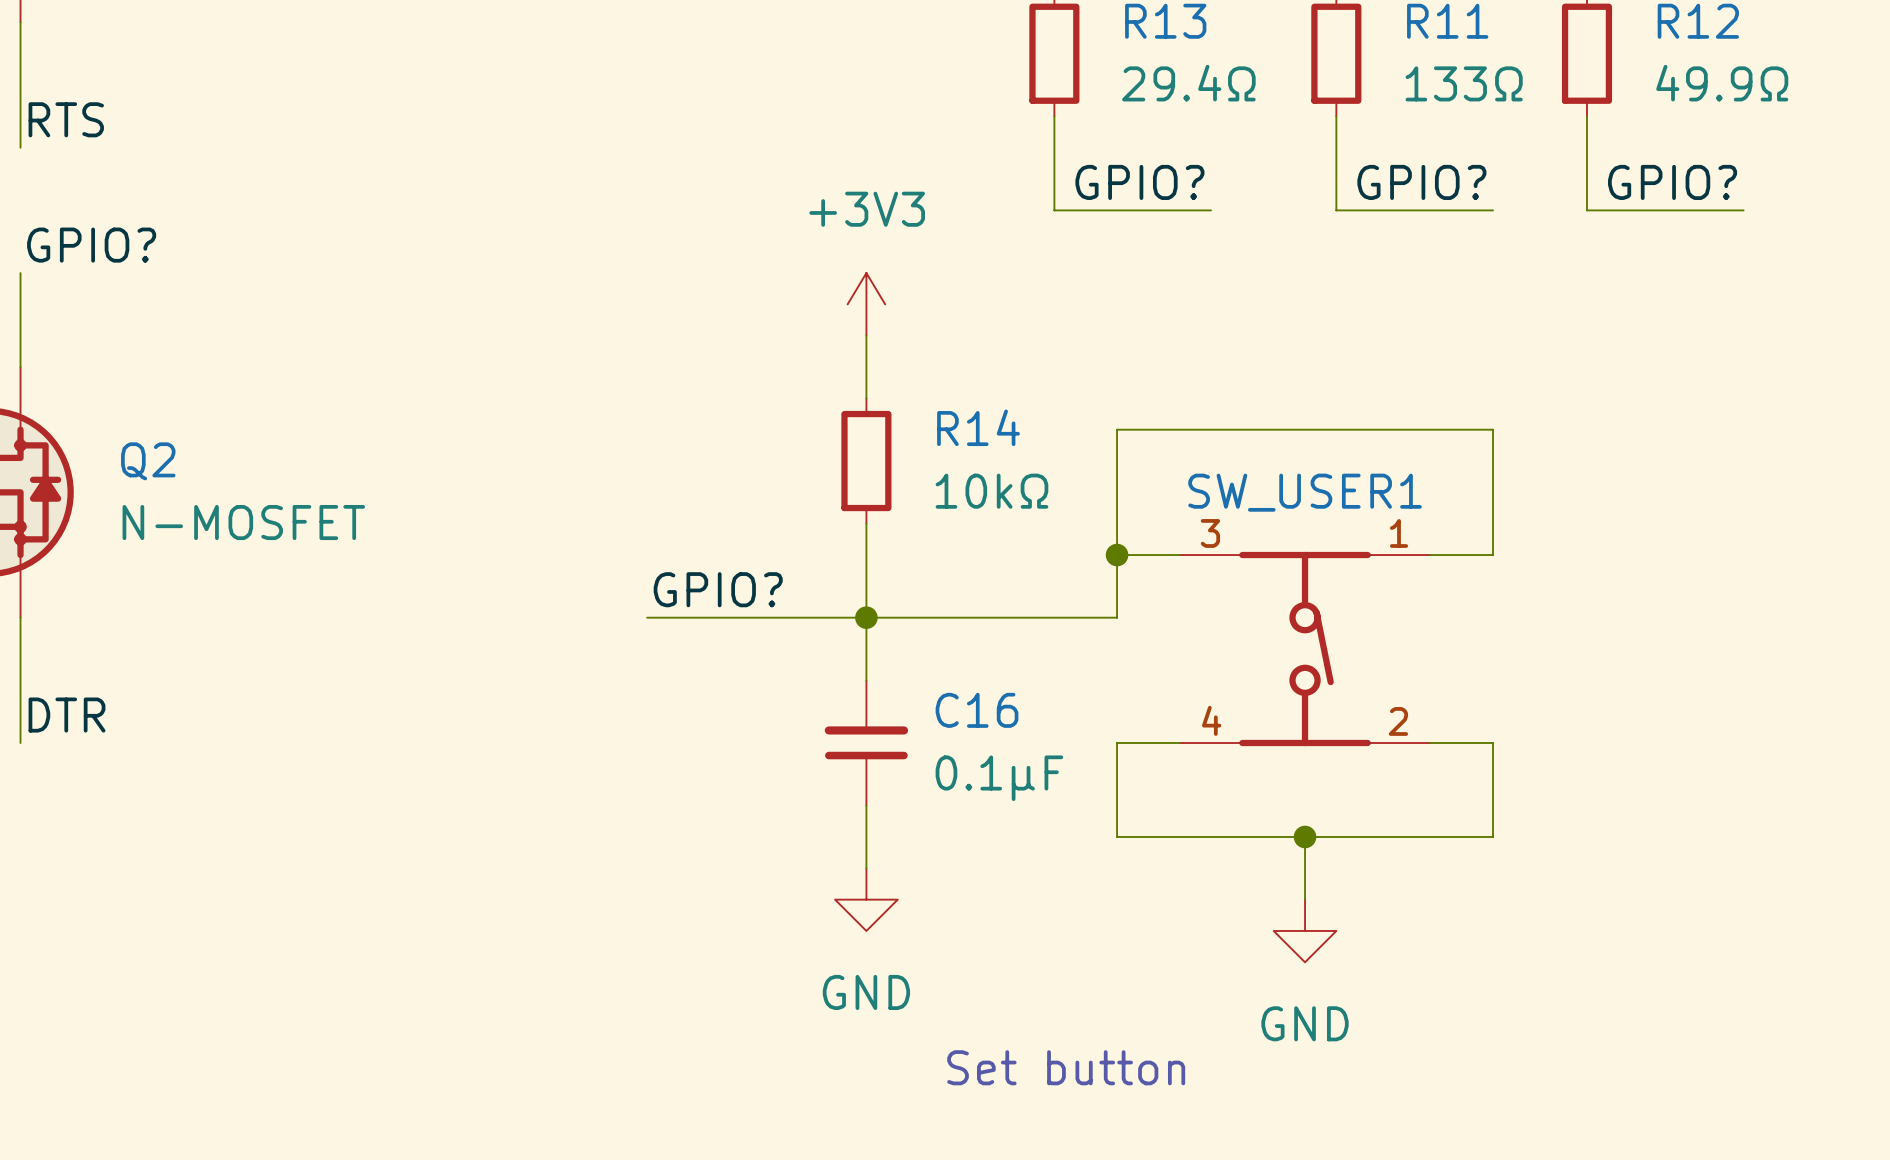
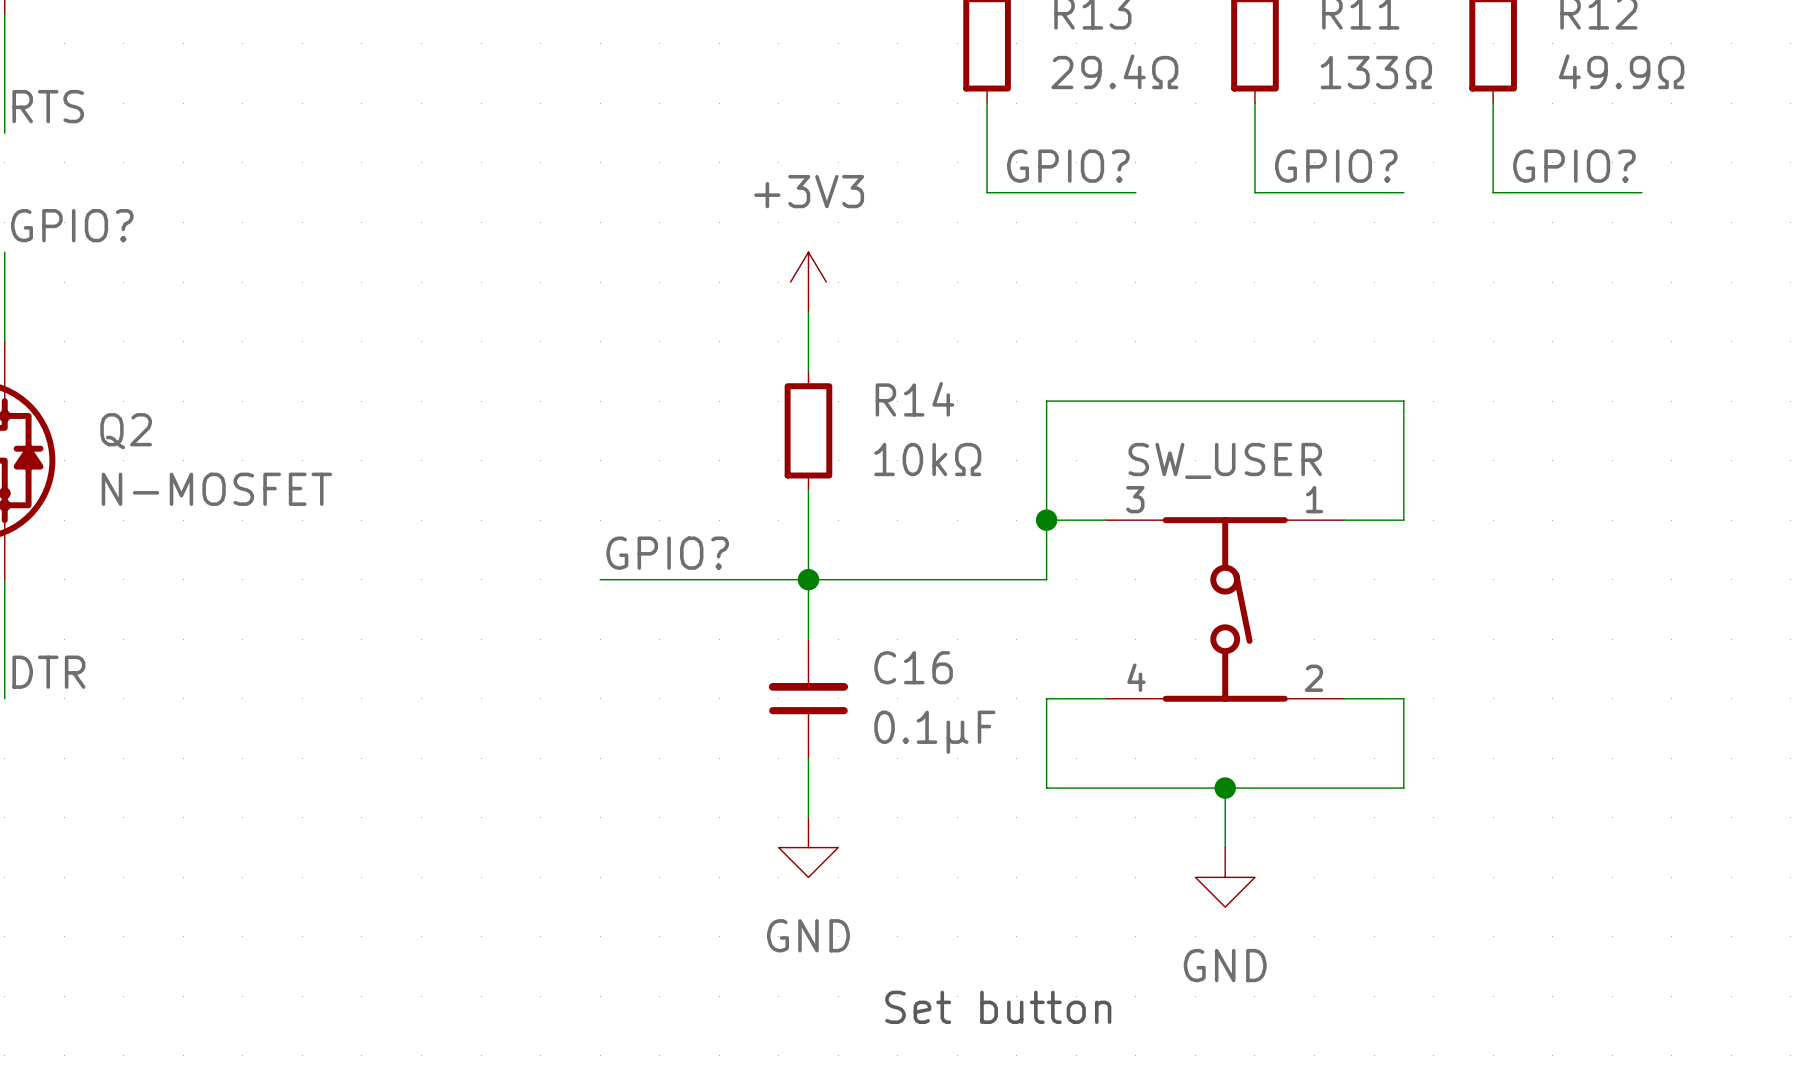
SW_USER1 name: SW_USER1 (1305, 492) -> SW_USER (1225, 460)

